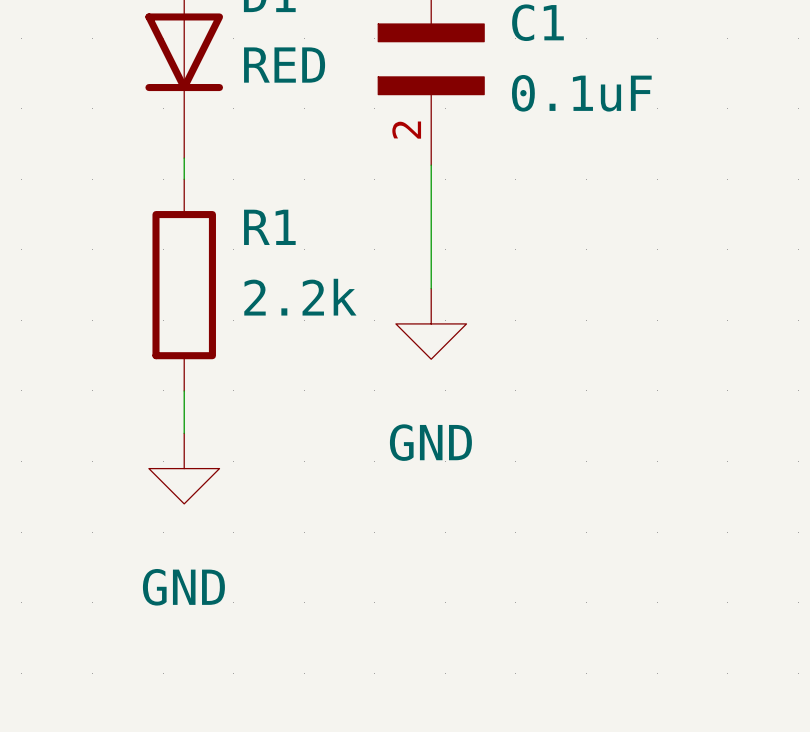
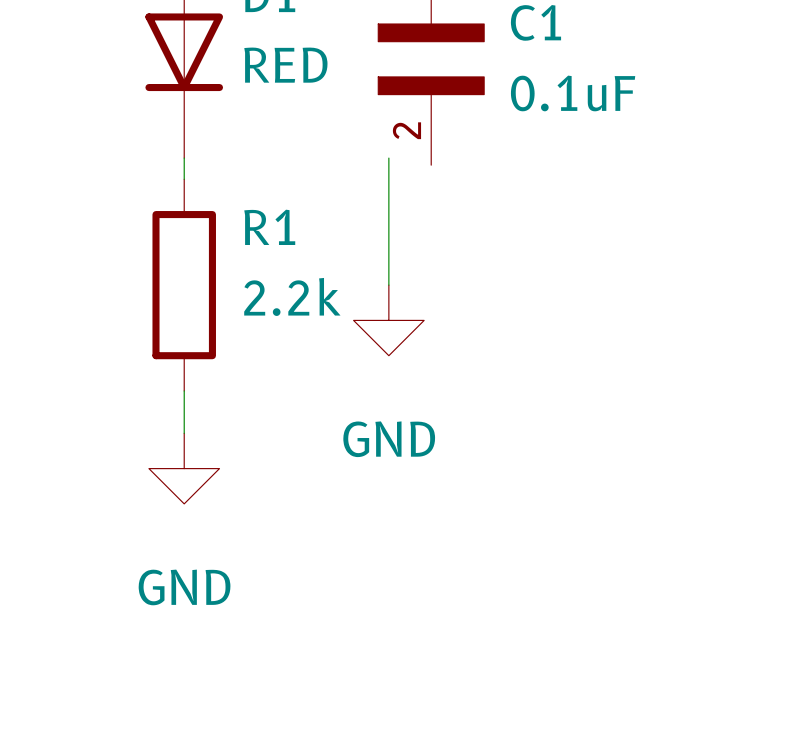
wire: none -> (388, 158) (388, 285)
wire: (431, 165) (431, 288) -> none
power symbol position: GND (431, 323) -> GND (388, 320)

